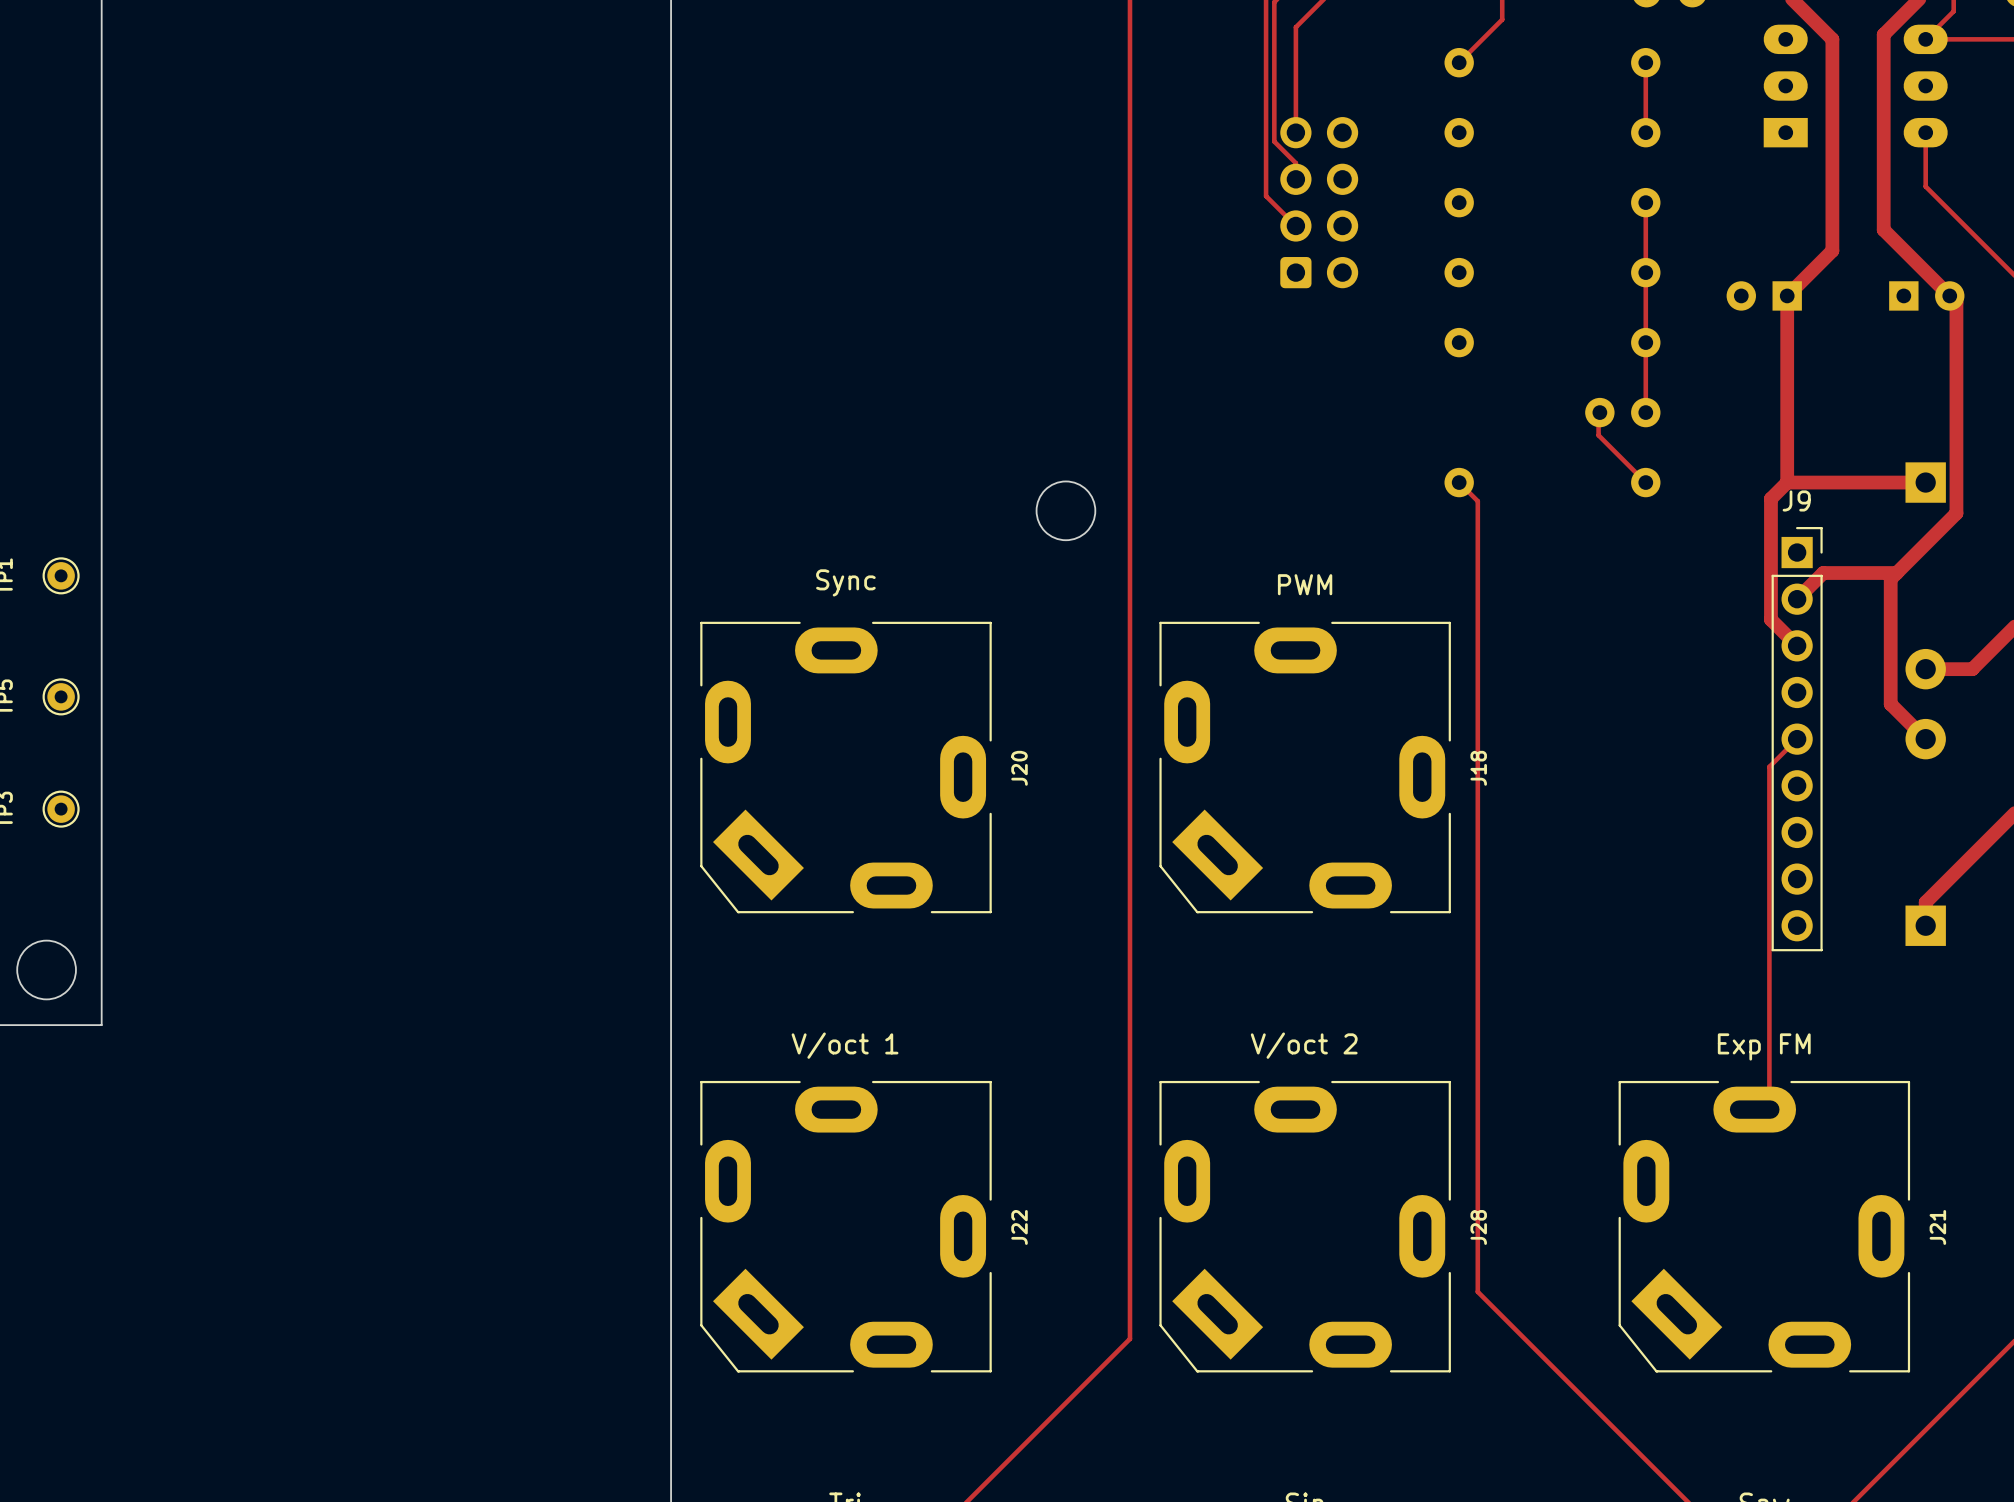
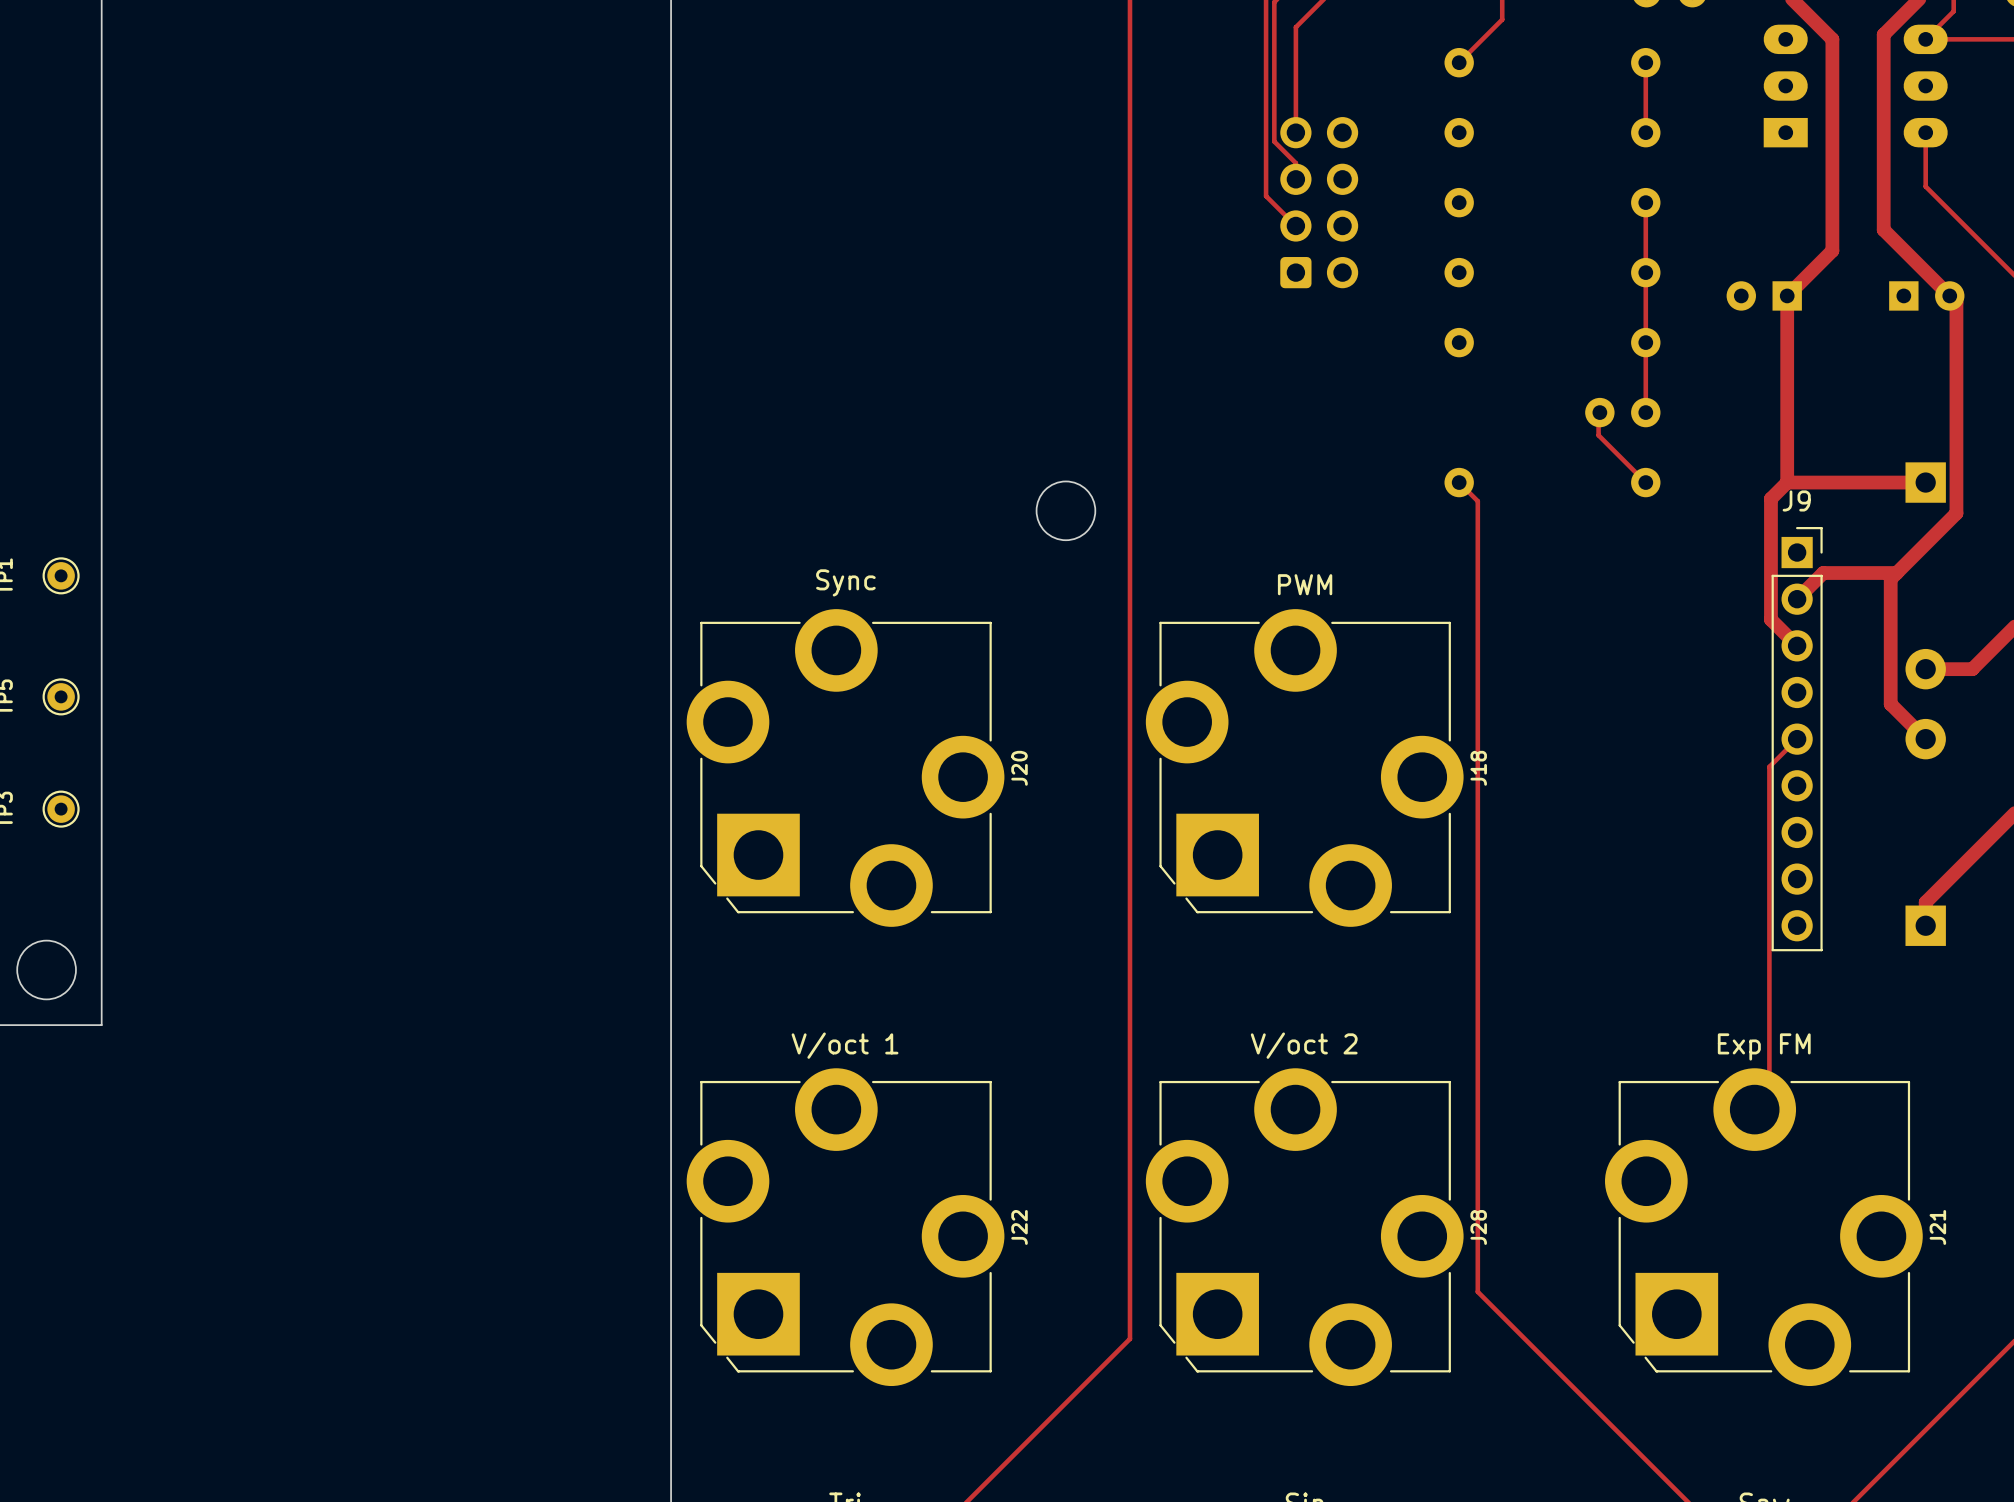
J20 footprint: [700, 621, 992, 914] -> [686, 609, 1005, 927]
J18 footprint: [1159, 621, 1451, 914] -> [1145, 609, 1464, 927]
J22 footprint: [700, 1080, 992, 1373] -> [686, 1068, 1005, 1387]
J28 footprint: [1159, 1080, 1451, 1373] -> [1145, 1068, 1464, 1387]
J21 footprint: [1618, 1080, 1911, 1373] -> [1605, 1068, 1923, 1387]

